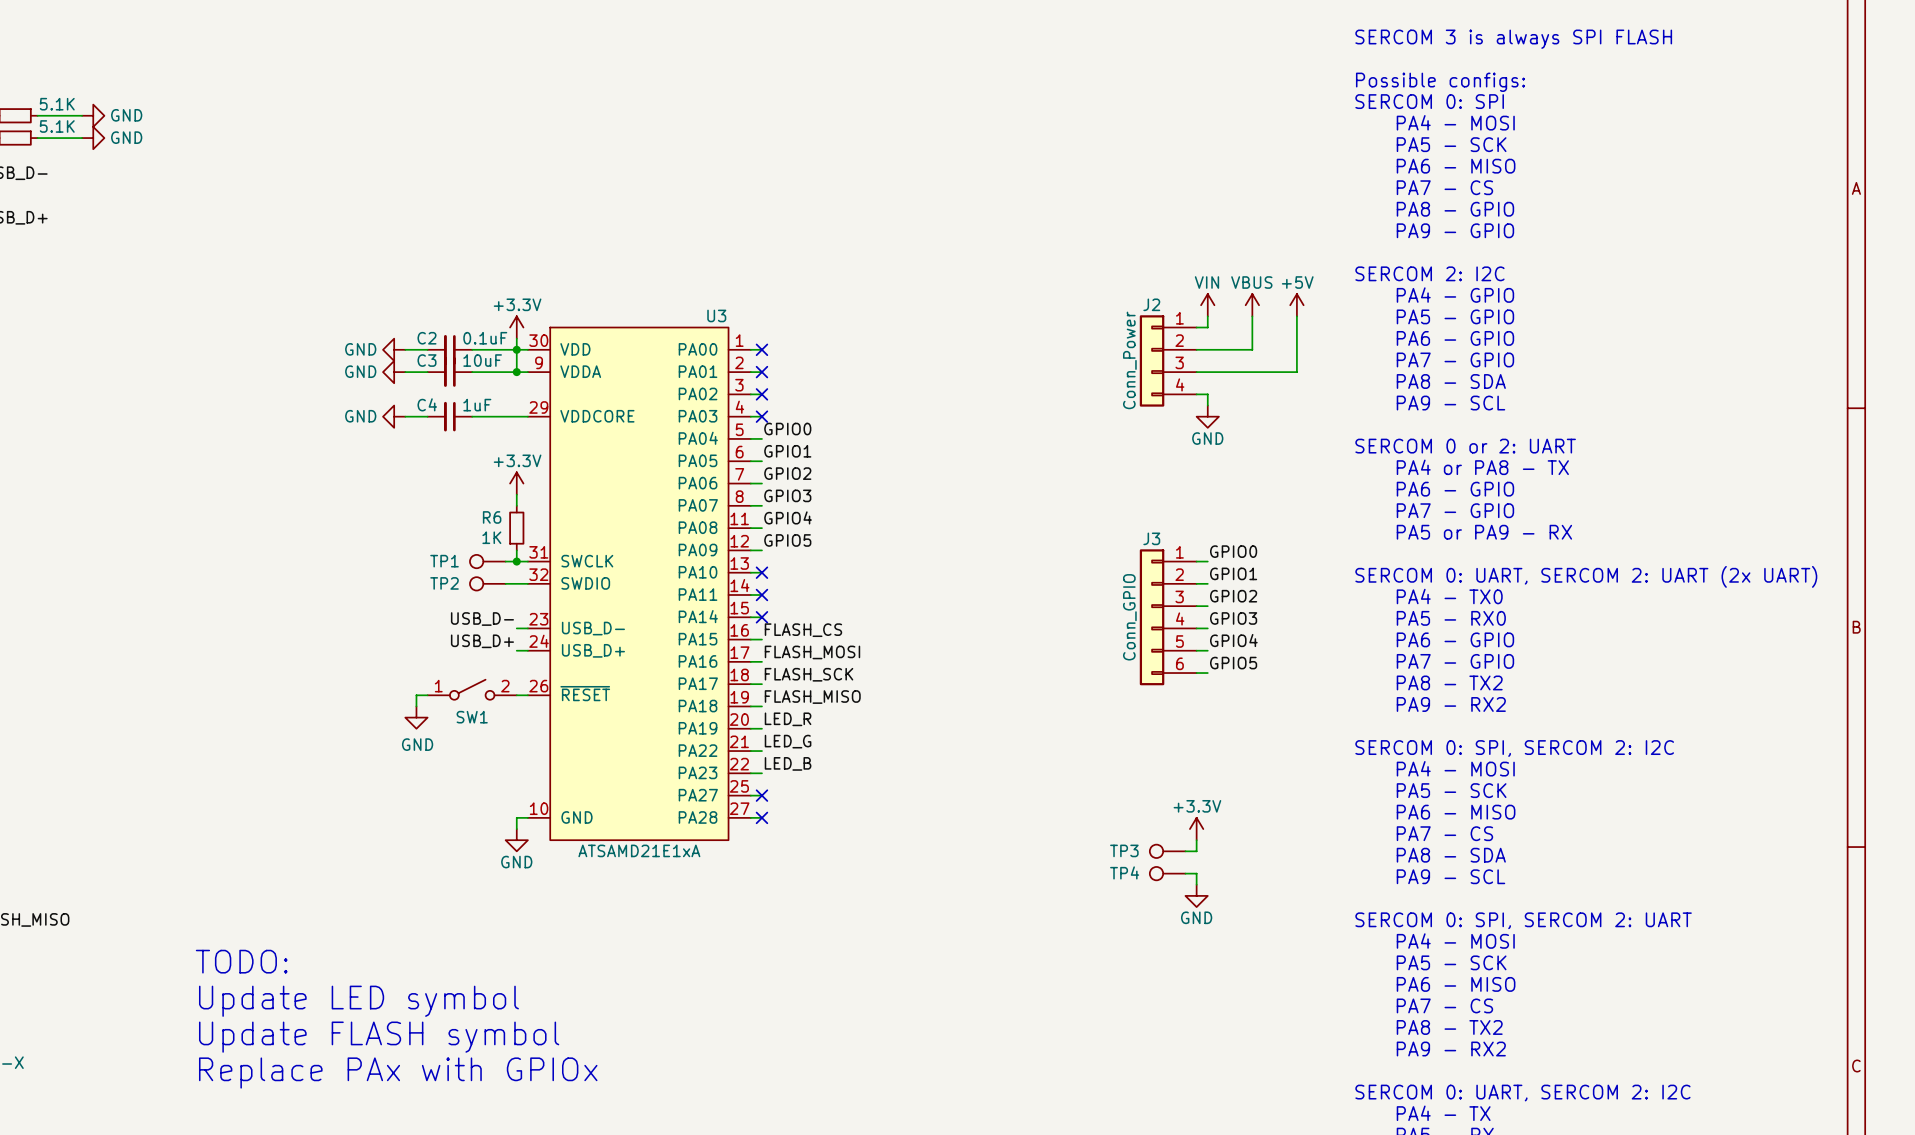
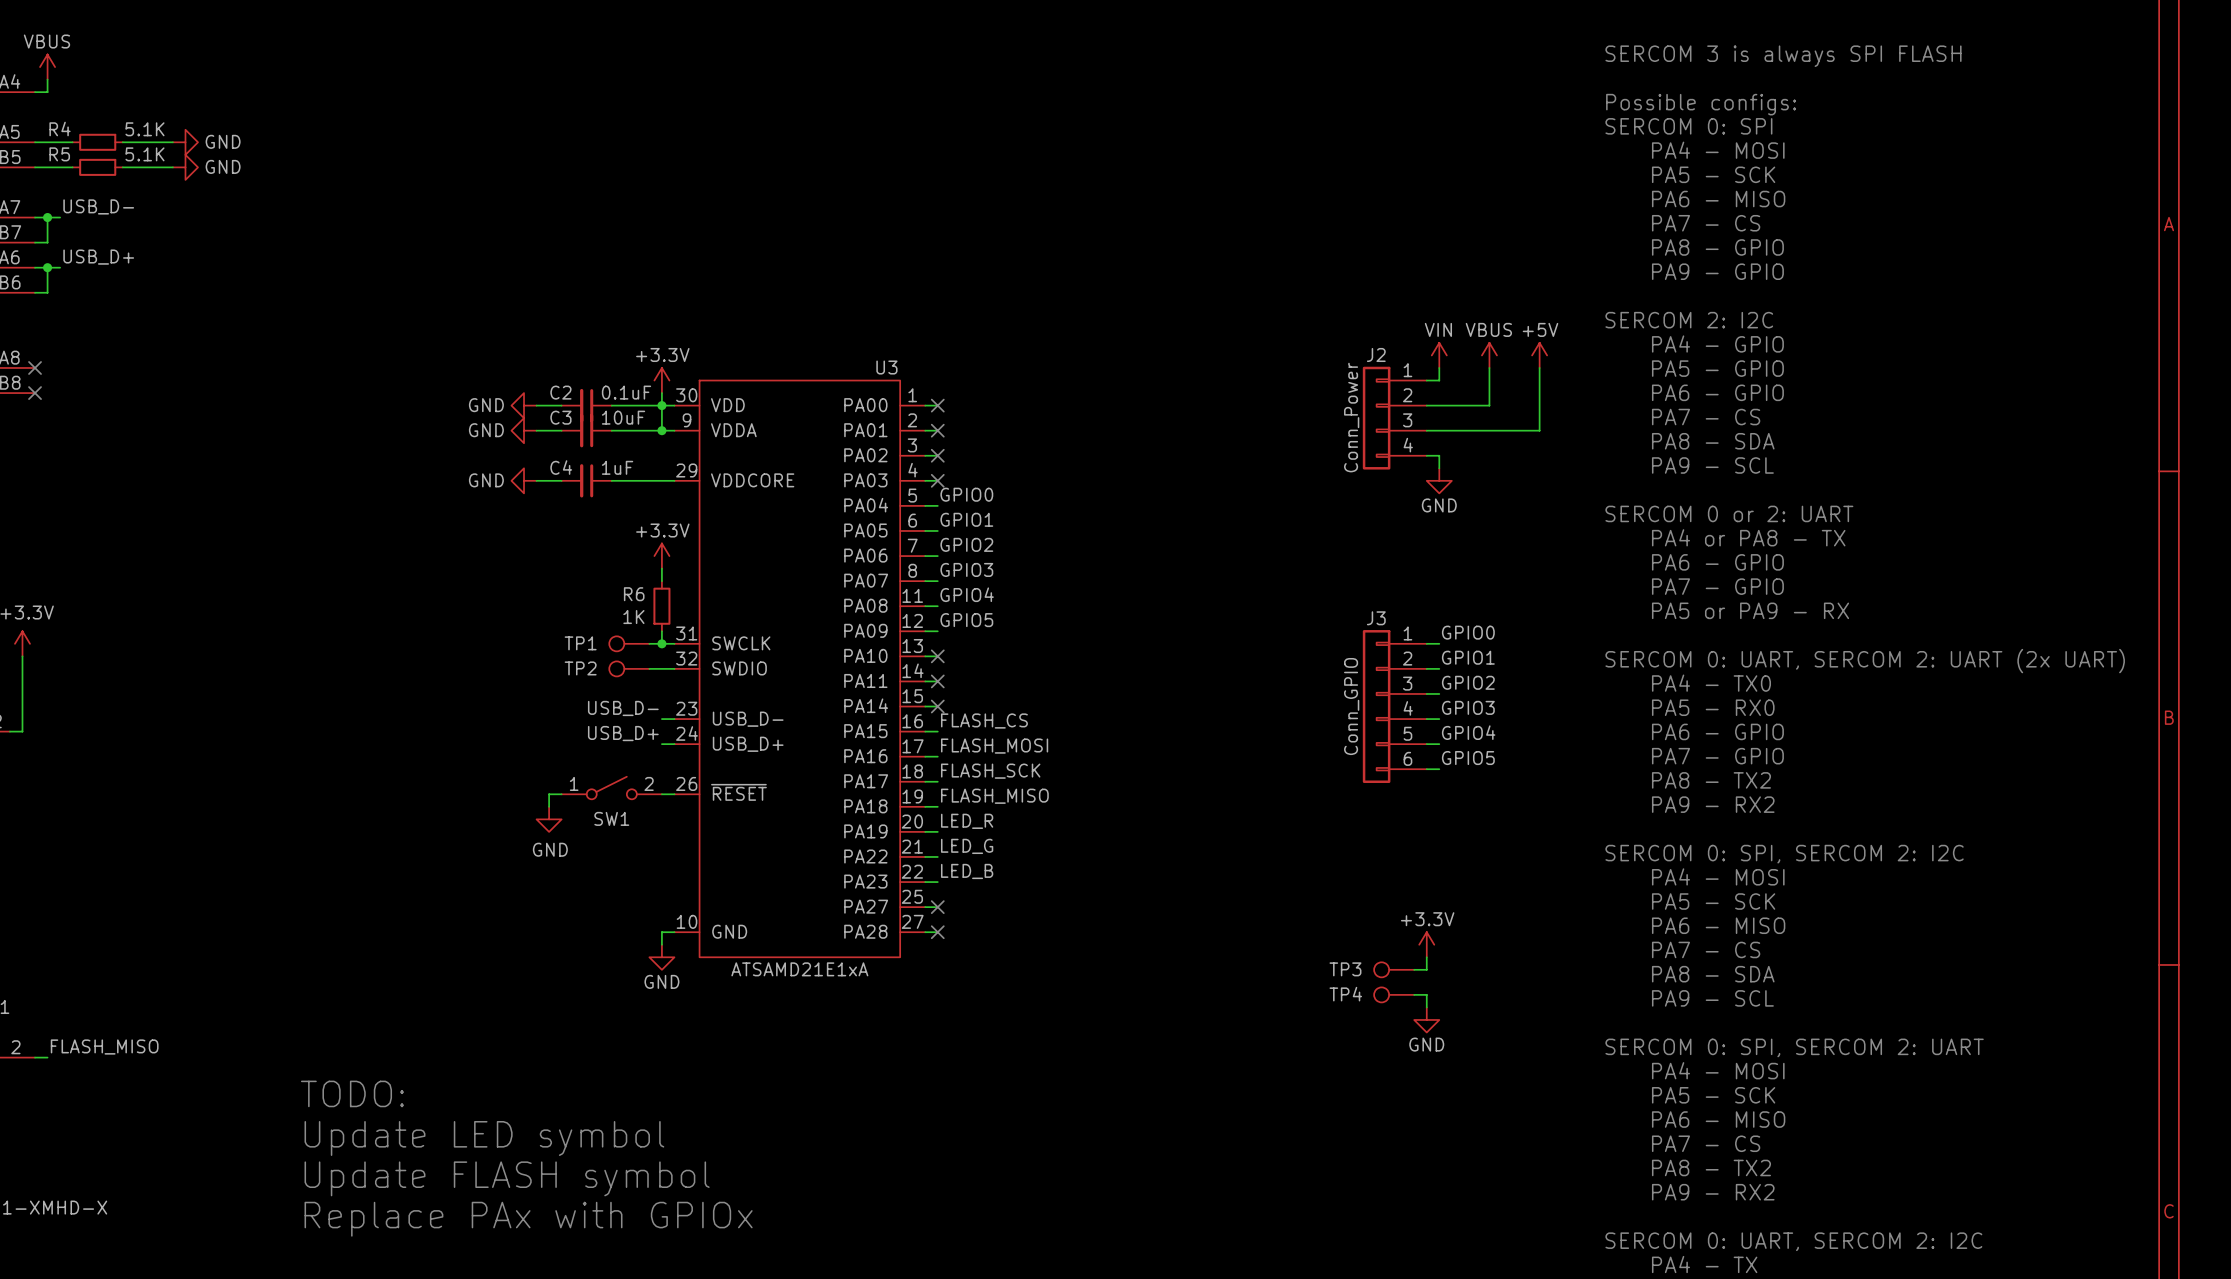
text: PA7 - GPIO (1455, 359) -> PA7 - CS (1706, 417)

